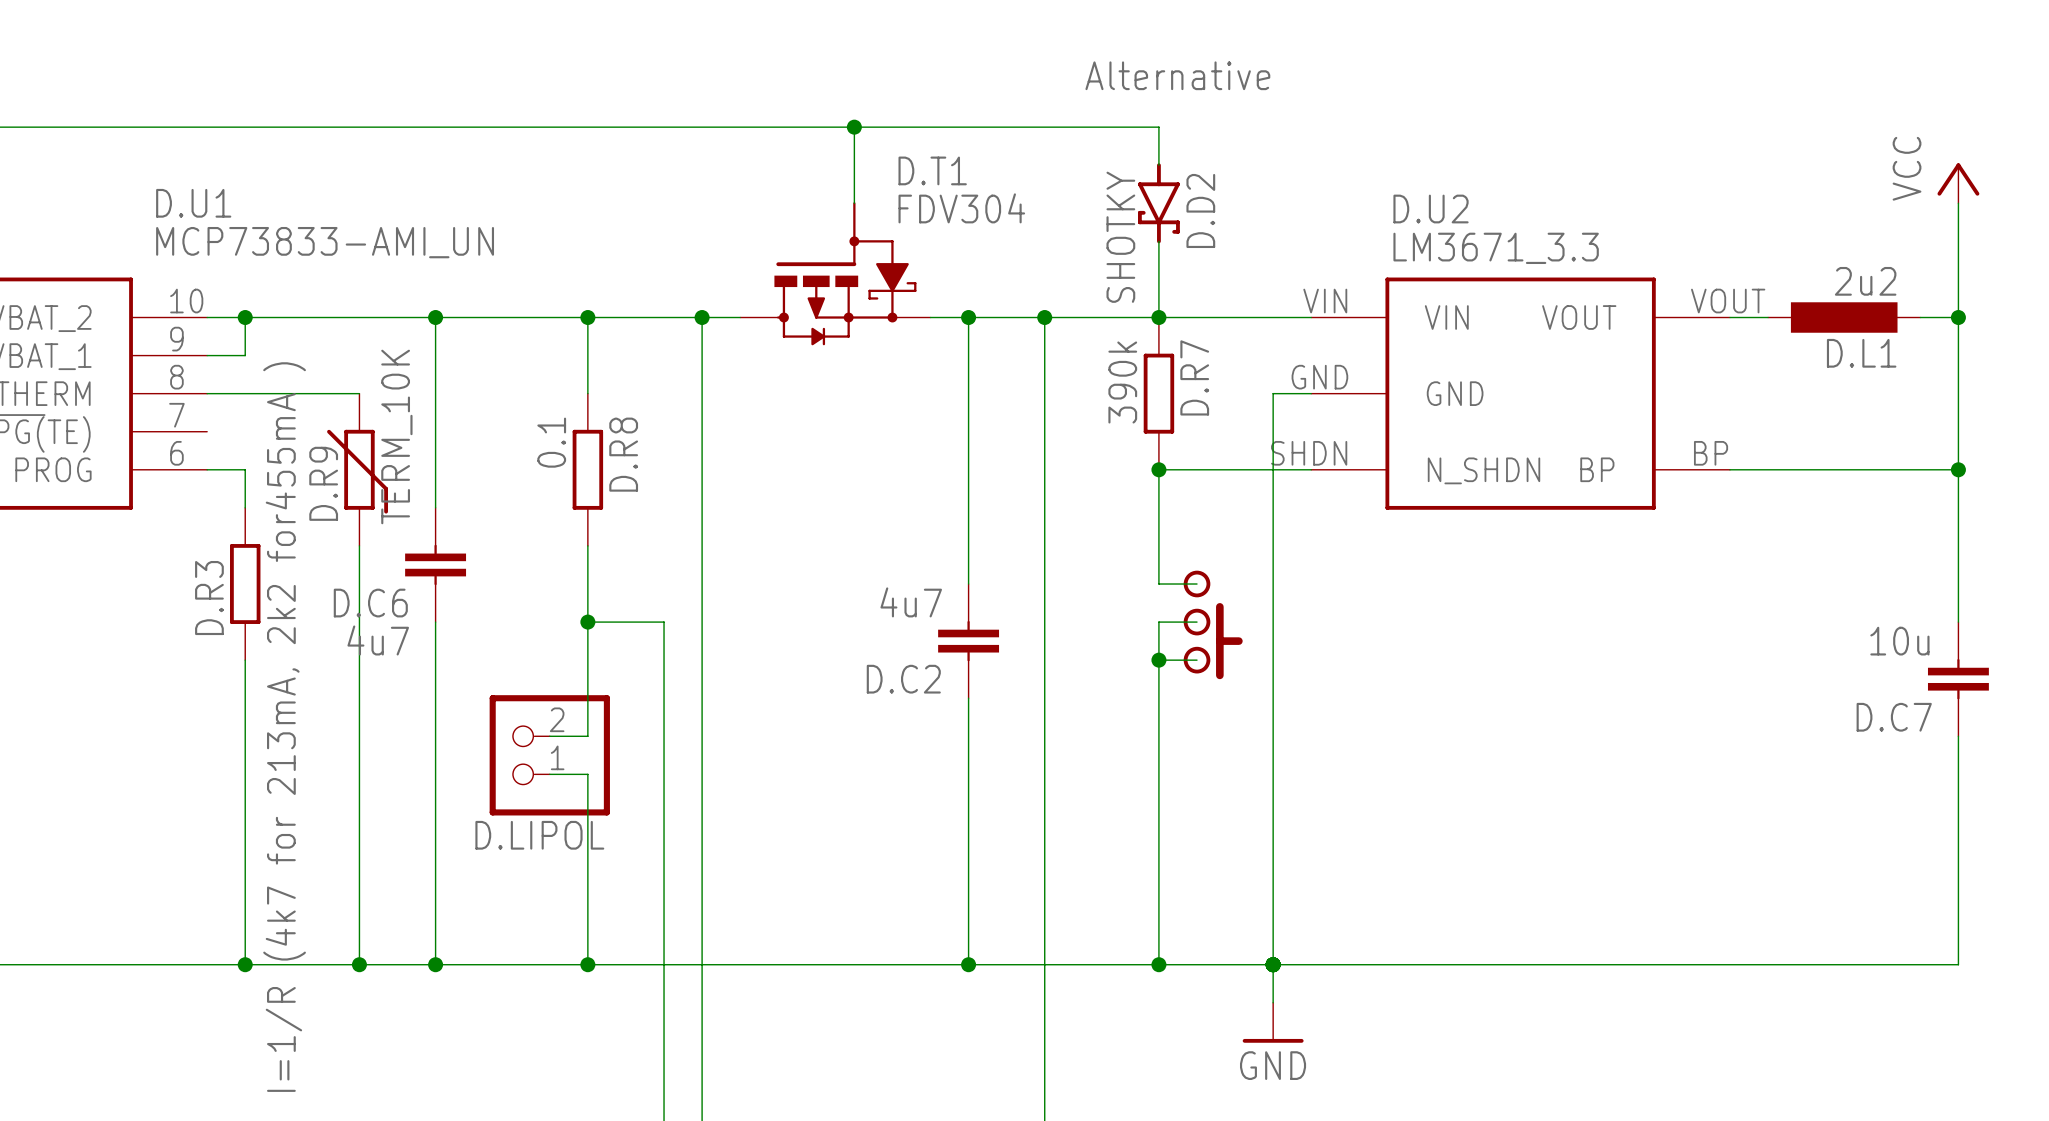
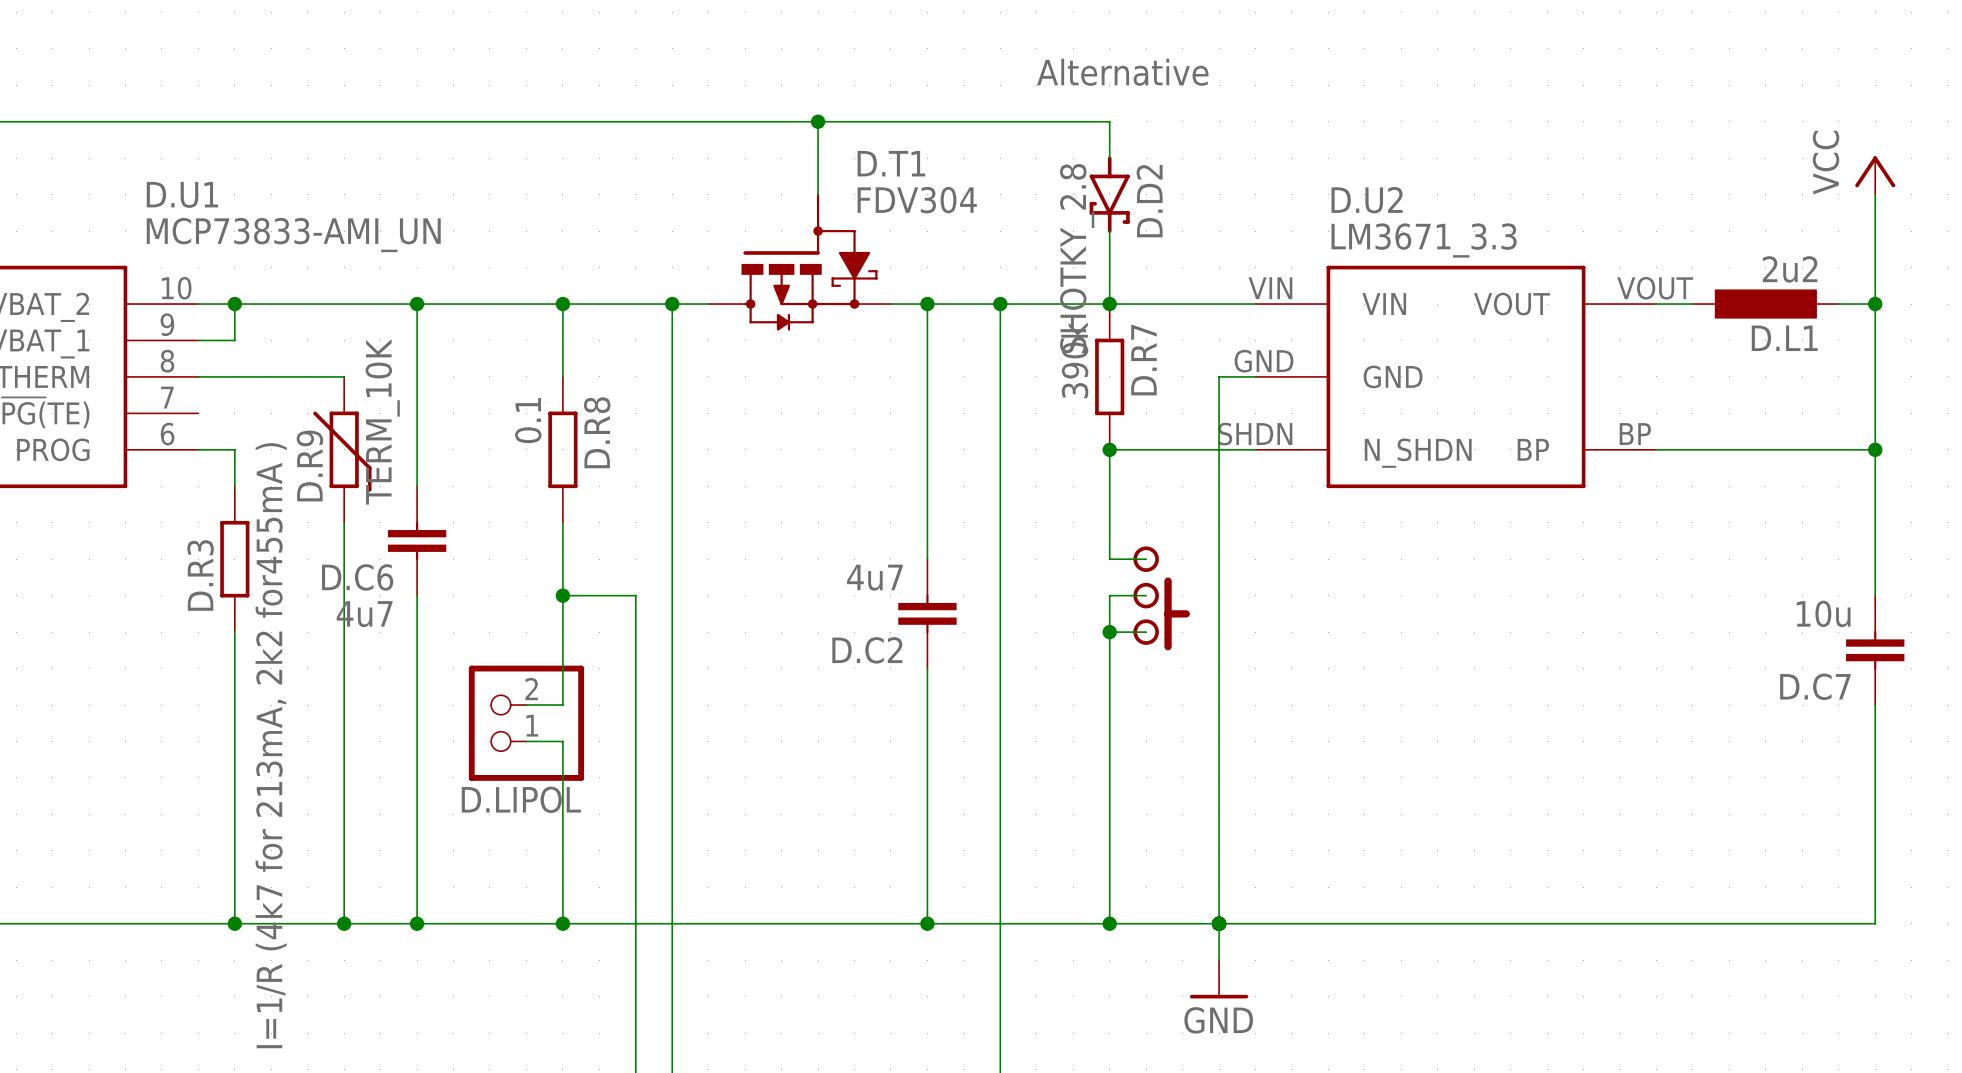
D.D2 value: SHOTKY (1120, 237) -> SHOTKY_2.8 (1077, 258)

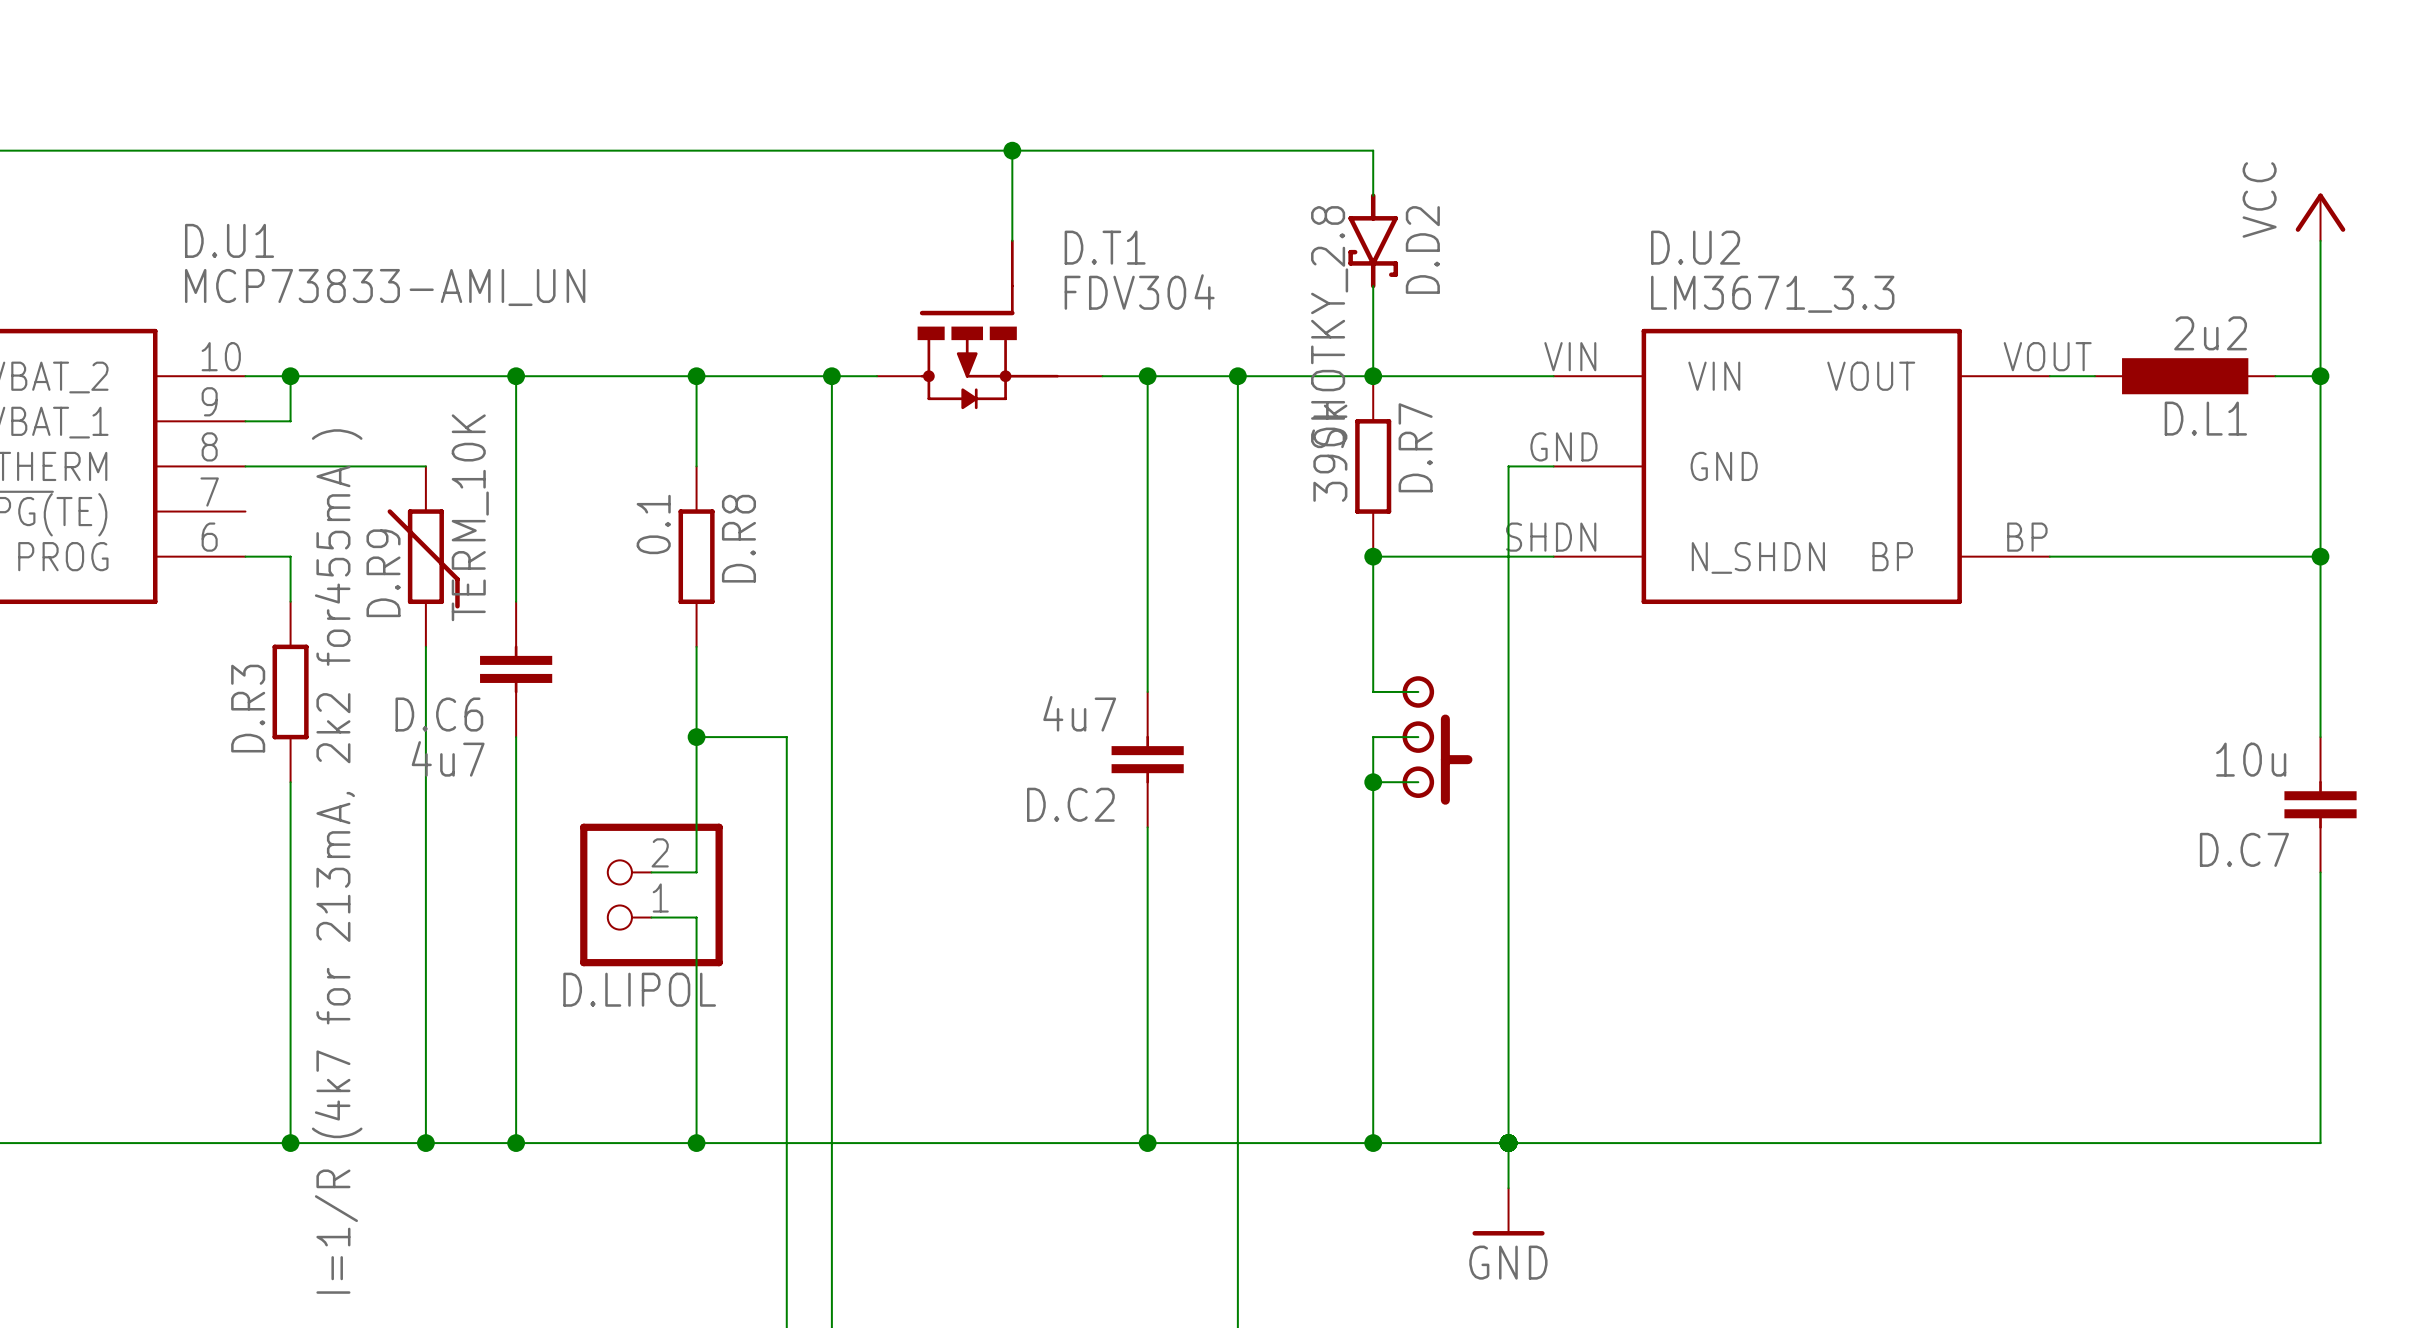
text: Alternative (1122, 72) -> none
D.T1 name position: D.T1 (891, 163) -> D.T1 (1105, 247)
D.T1 symbol: [708, 193, 891, 331] -> [877, 239, 1103, 410]
D.T1 value position: FDV304 (917, 200) -> FDV304 (1139, 292)

